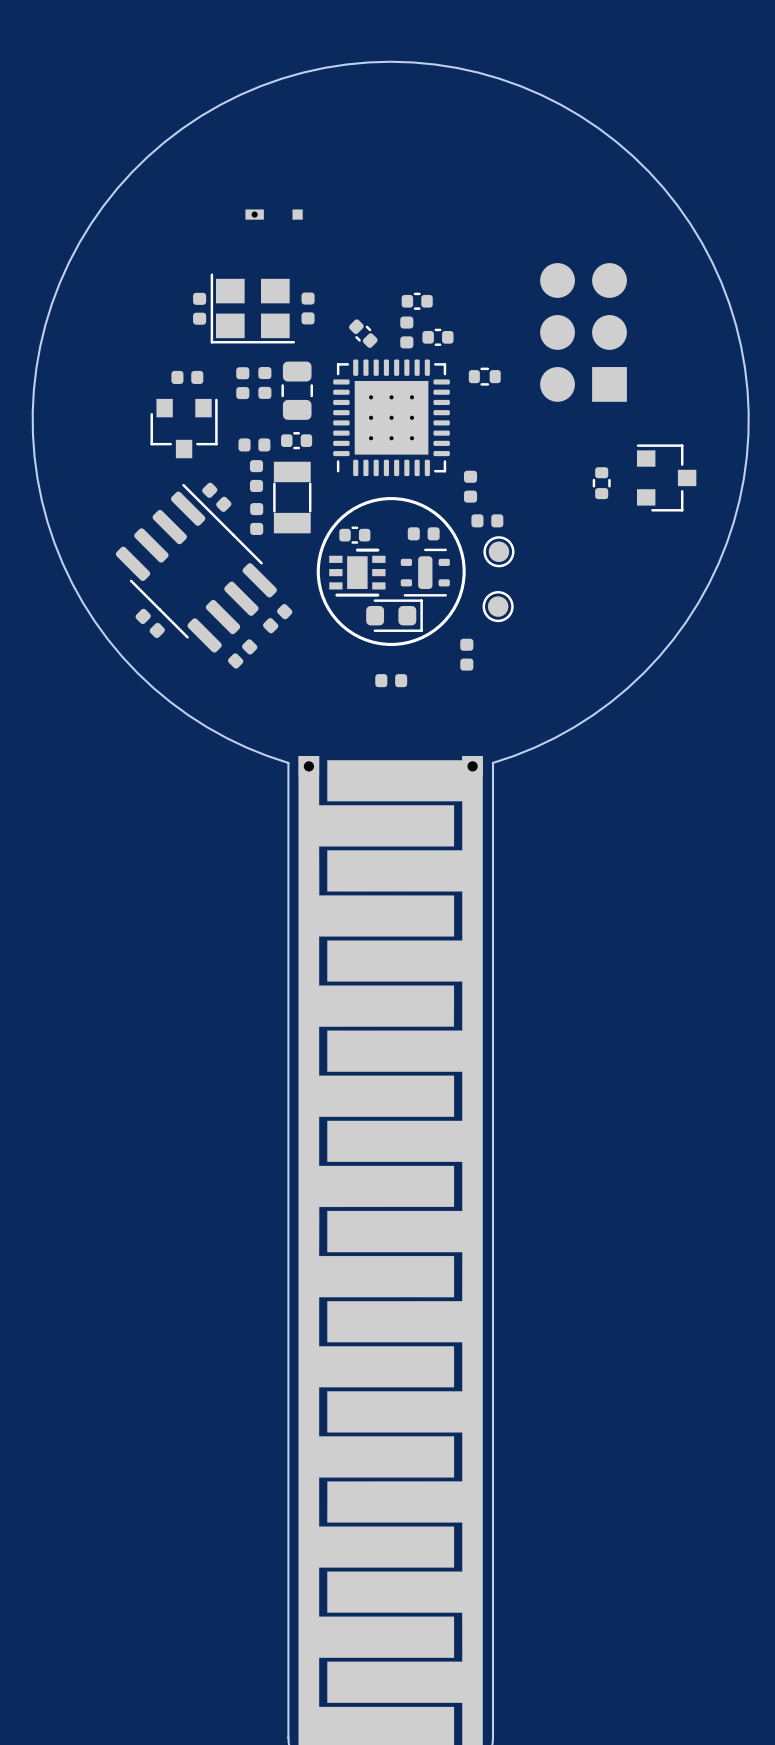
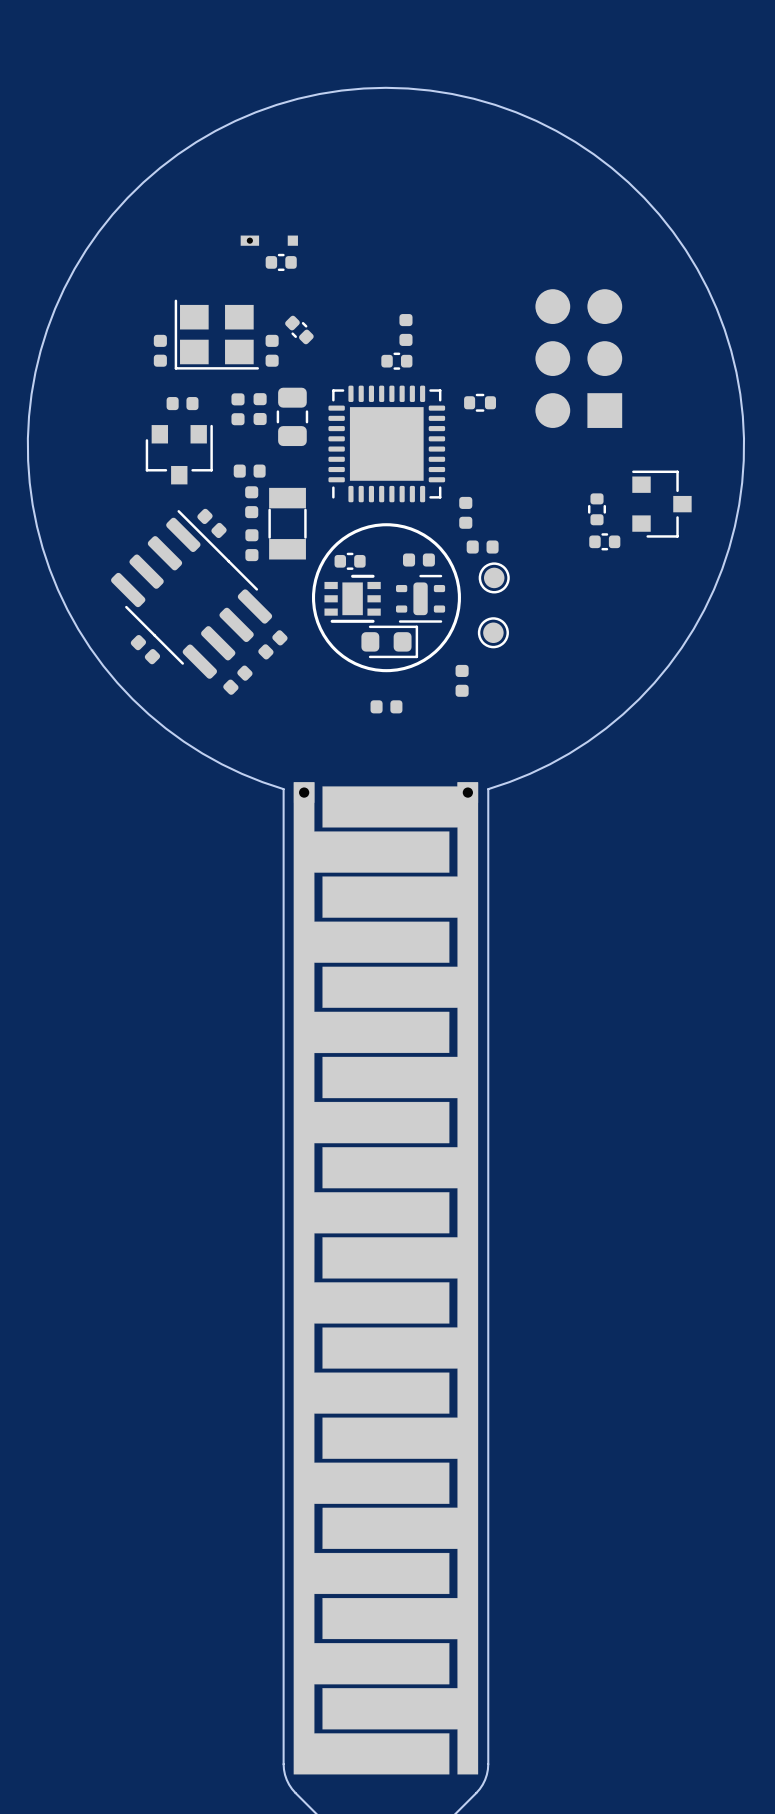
part: none -> (281, 262)
part footprint: [301, 292, 315, 325] -> [285, 315, 314, 345]
part footprint: [401, 292, 433, 310] -> [399, 314, 413, 346]
part position: (199, 308) -> (160, 350)
part position: (252, 308) -> (216, 334)
part footprint: [400, 316, 414, 349] -> [381, 352, 413, 370]
part: none -> (272, 350)
part: (363, 333) -> none
part: (437, 337) -> none
part footprint: [333, 359, 450, 477] -> [328, 385, 446, 503]
part: (296, 440) -> none
part: none -> (604, 541)

